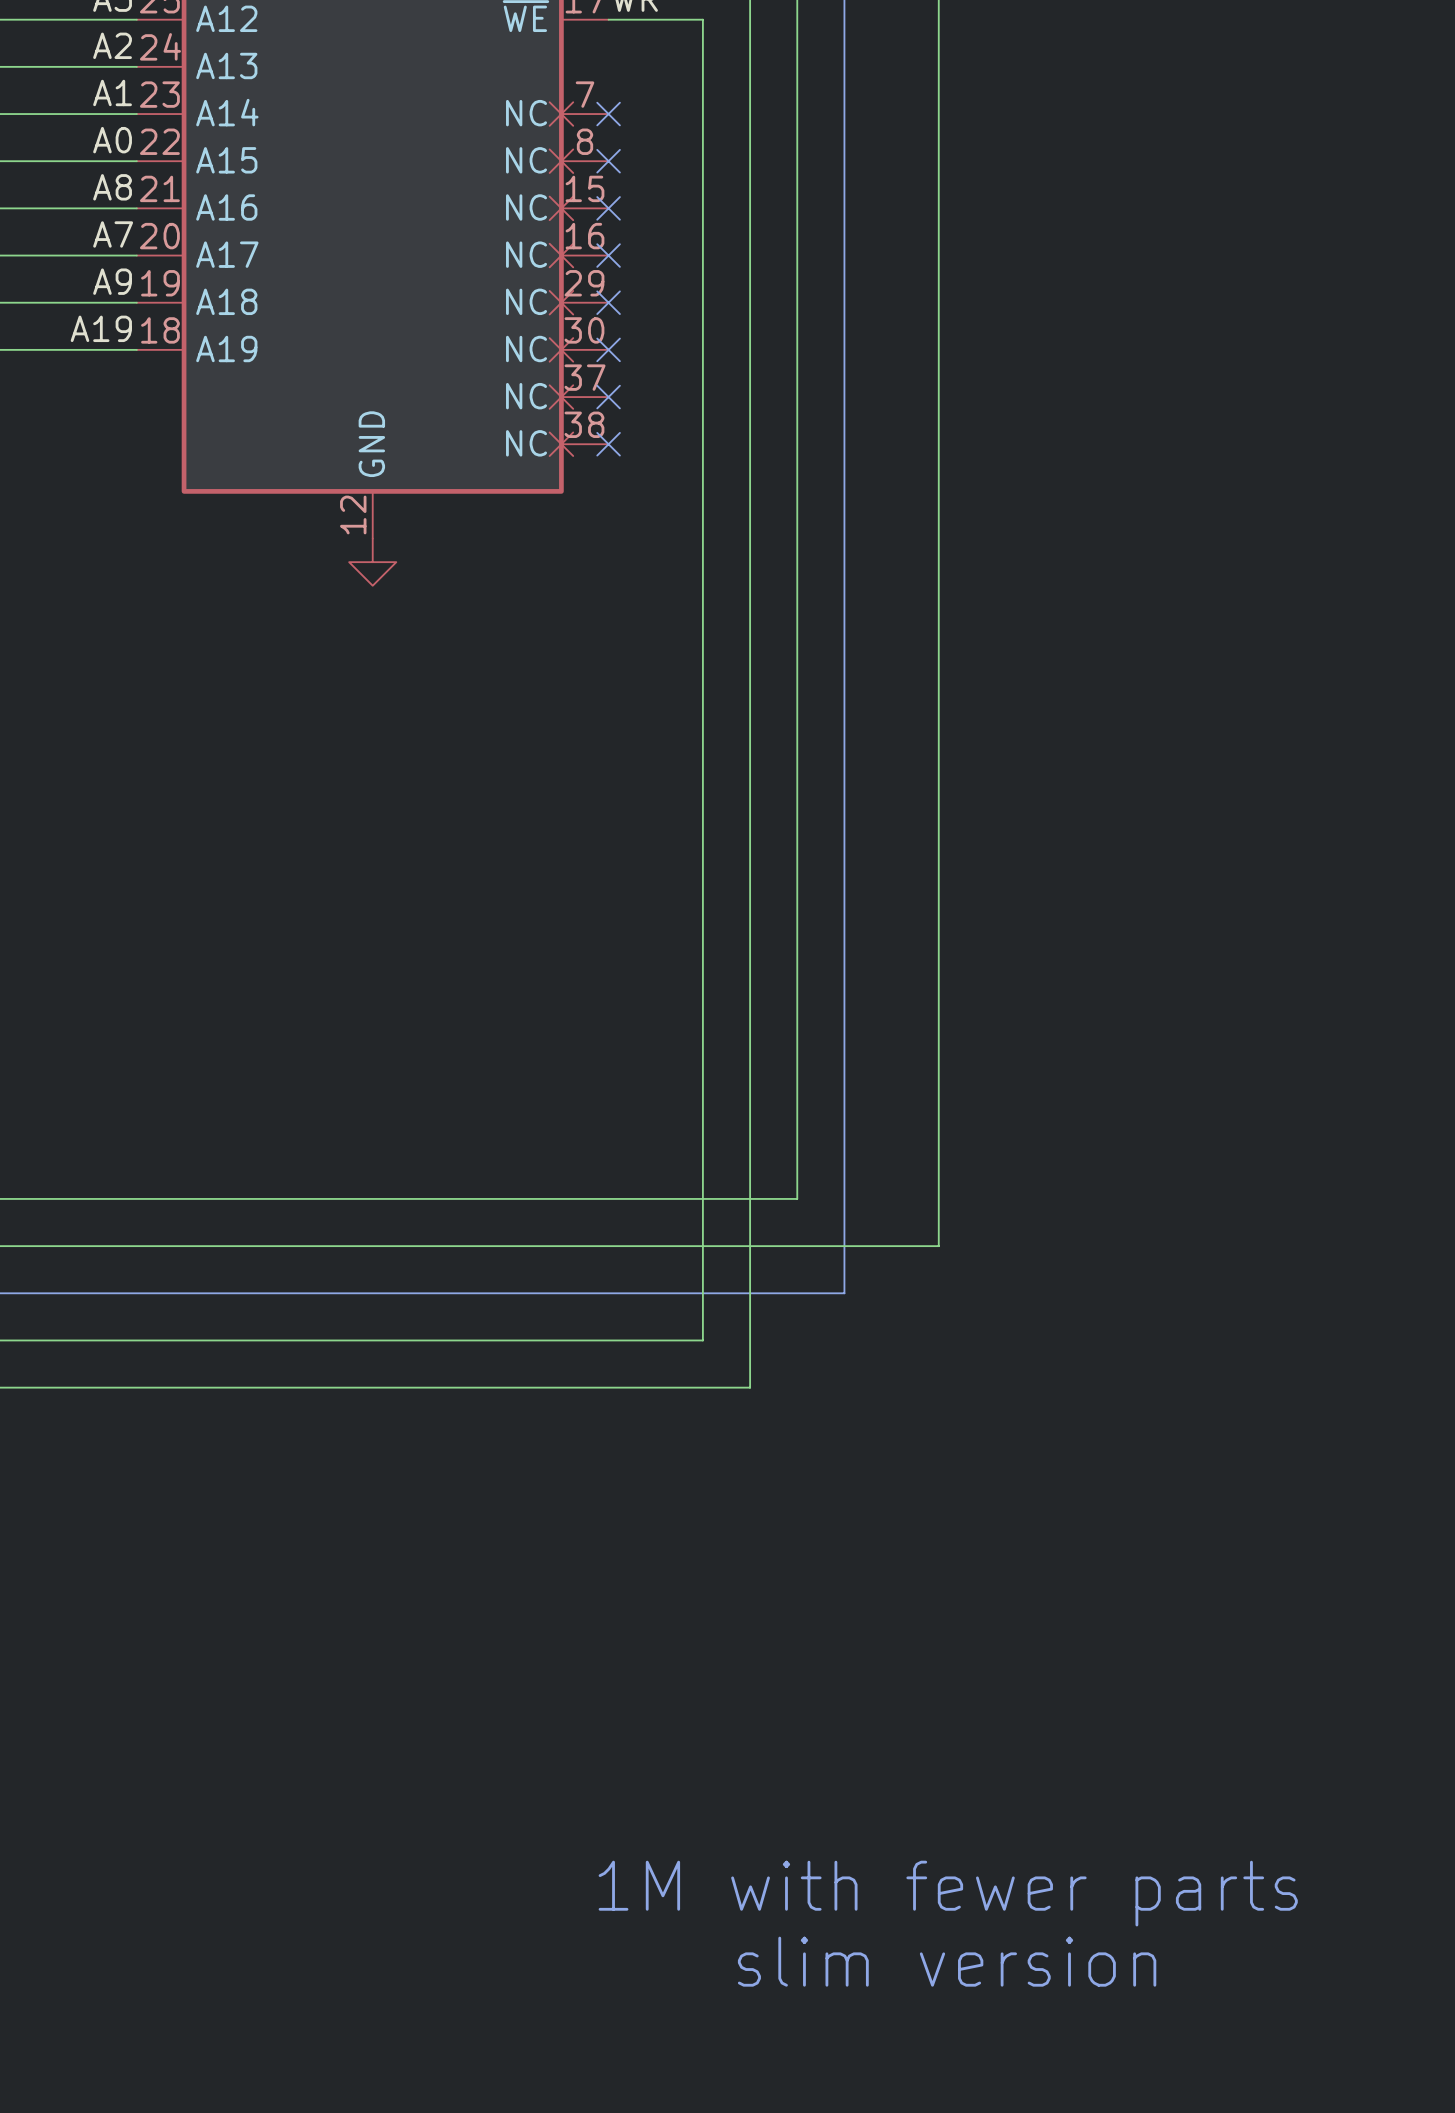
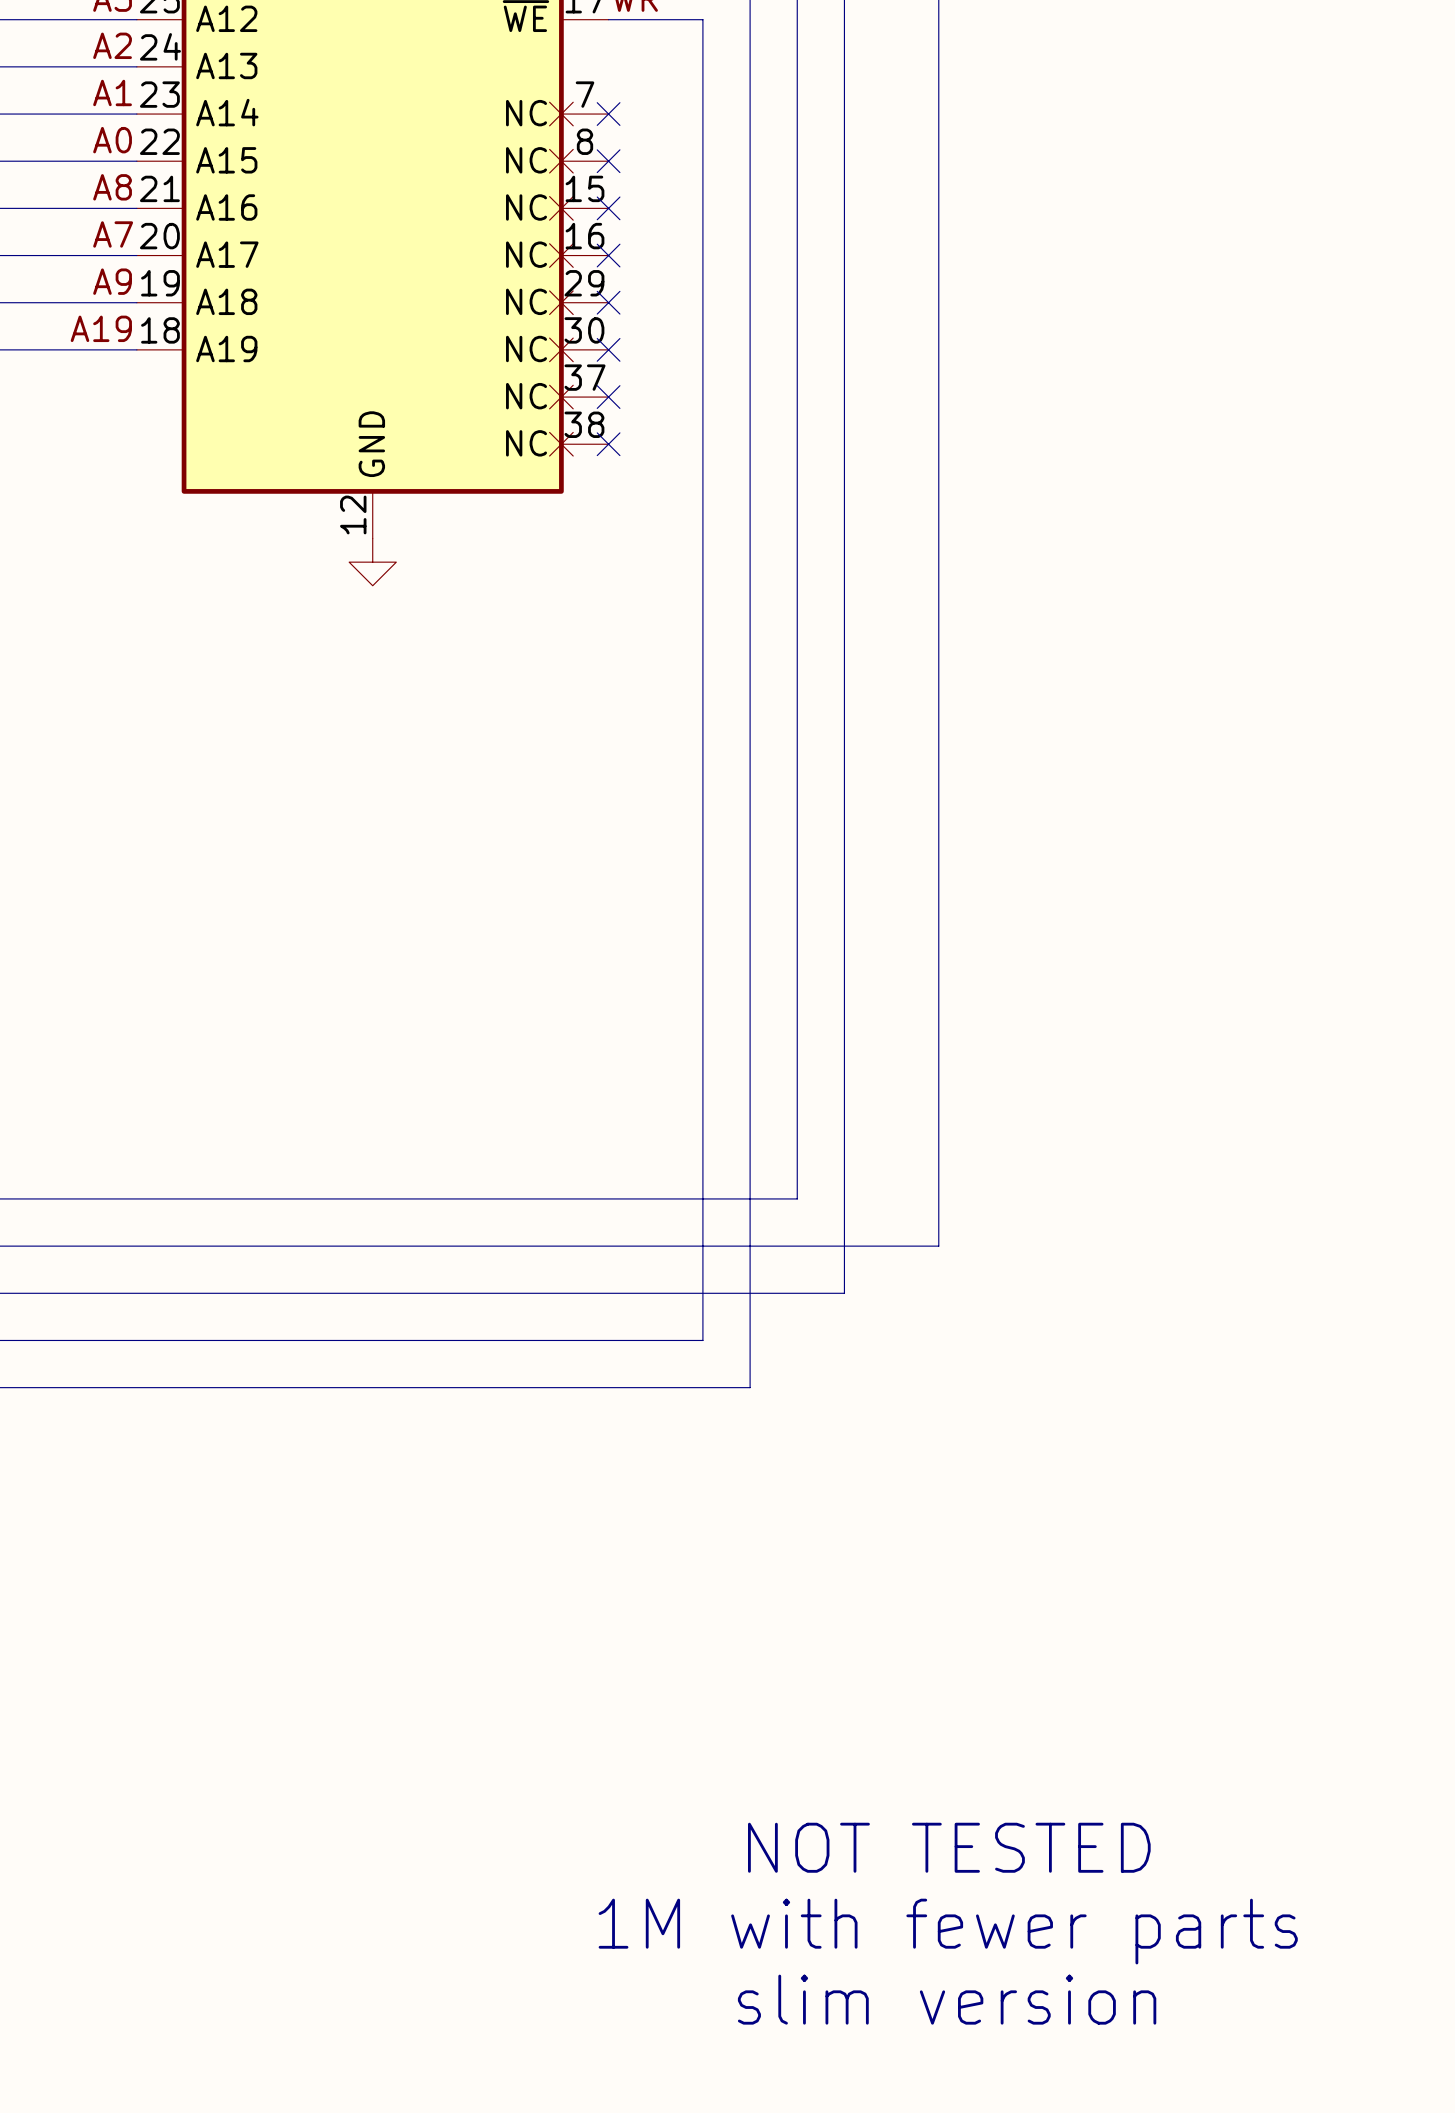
text: none -> NOT TESTED (949, 1847)
text position: 1M with fewer parts (948, 1893) -> 1M with fewer parts (948, 1931)
text position: slim version (947, 1961) -> slim version (947, 1999)

